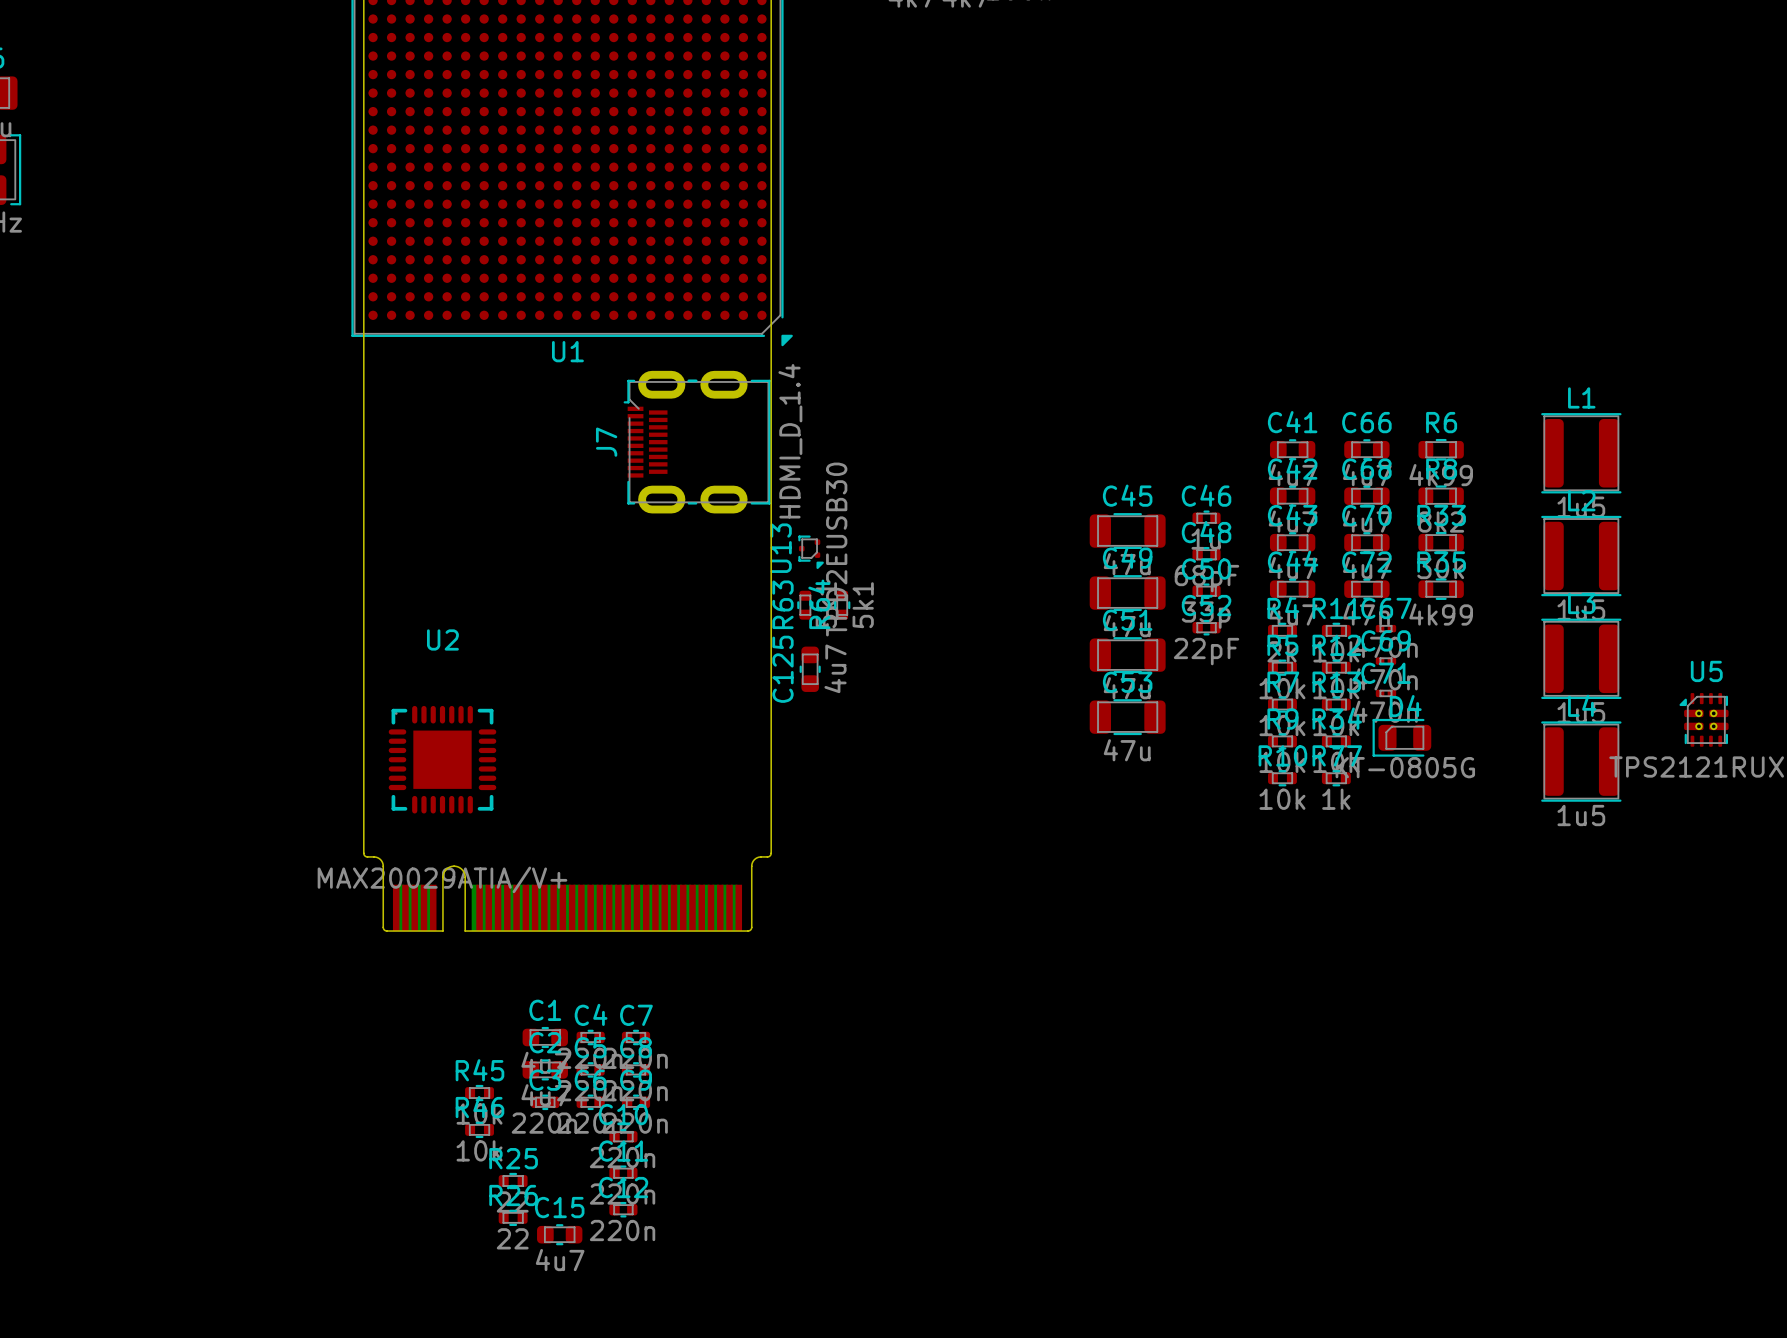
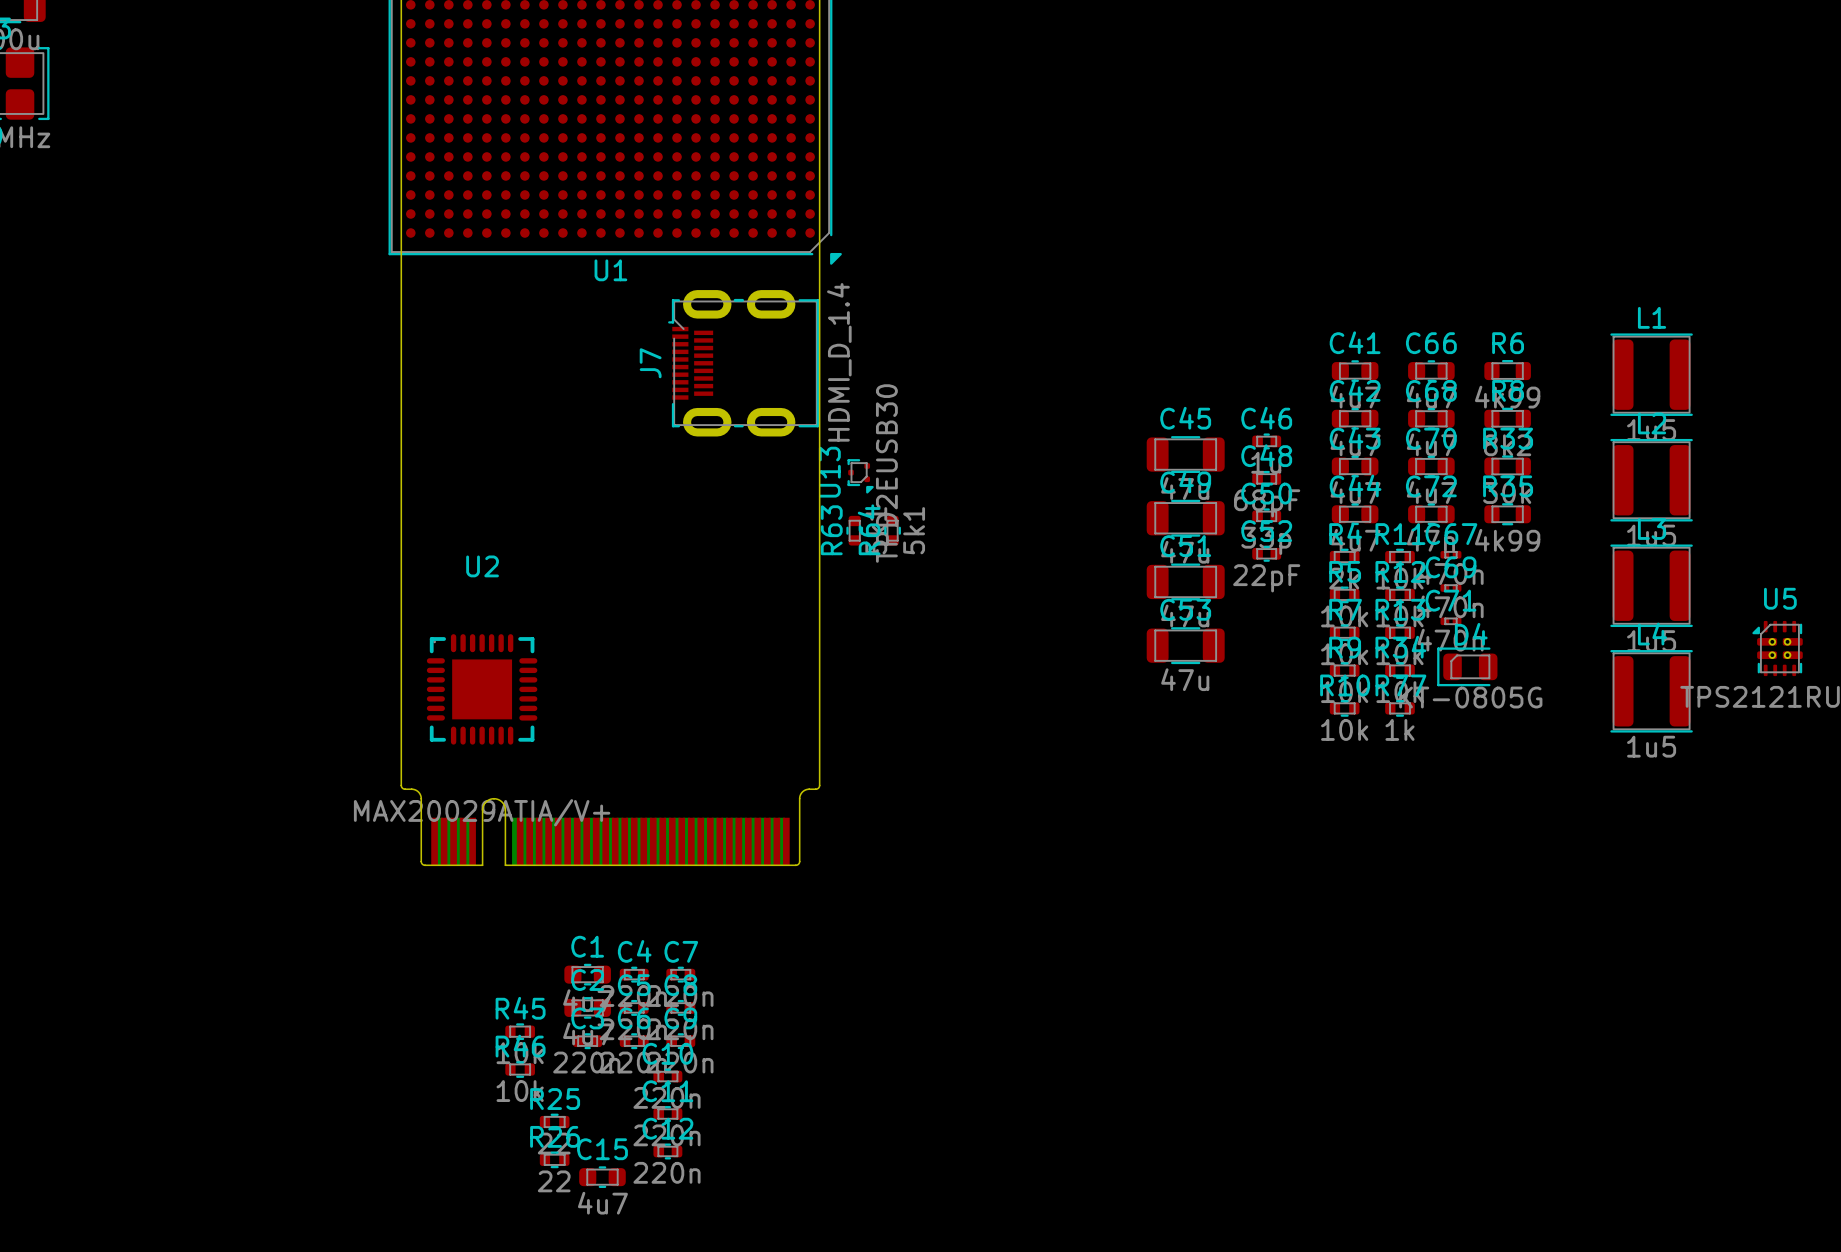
C125: 4u7 (810, 669) -> none

